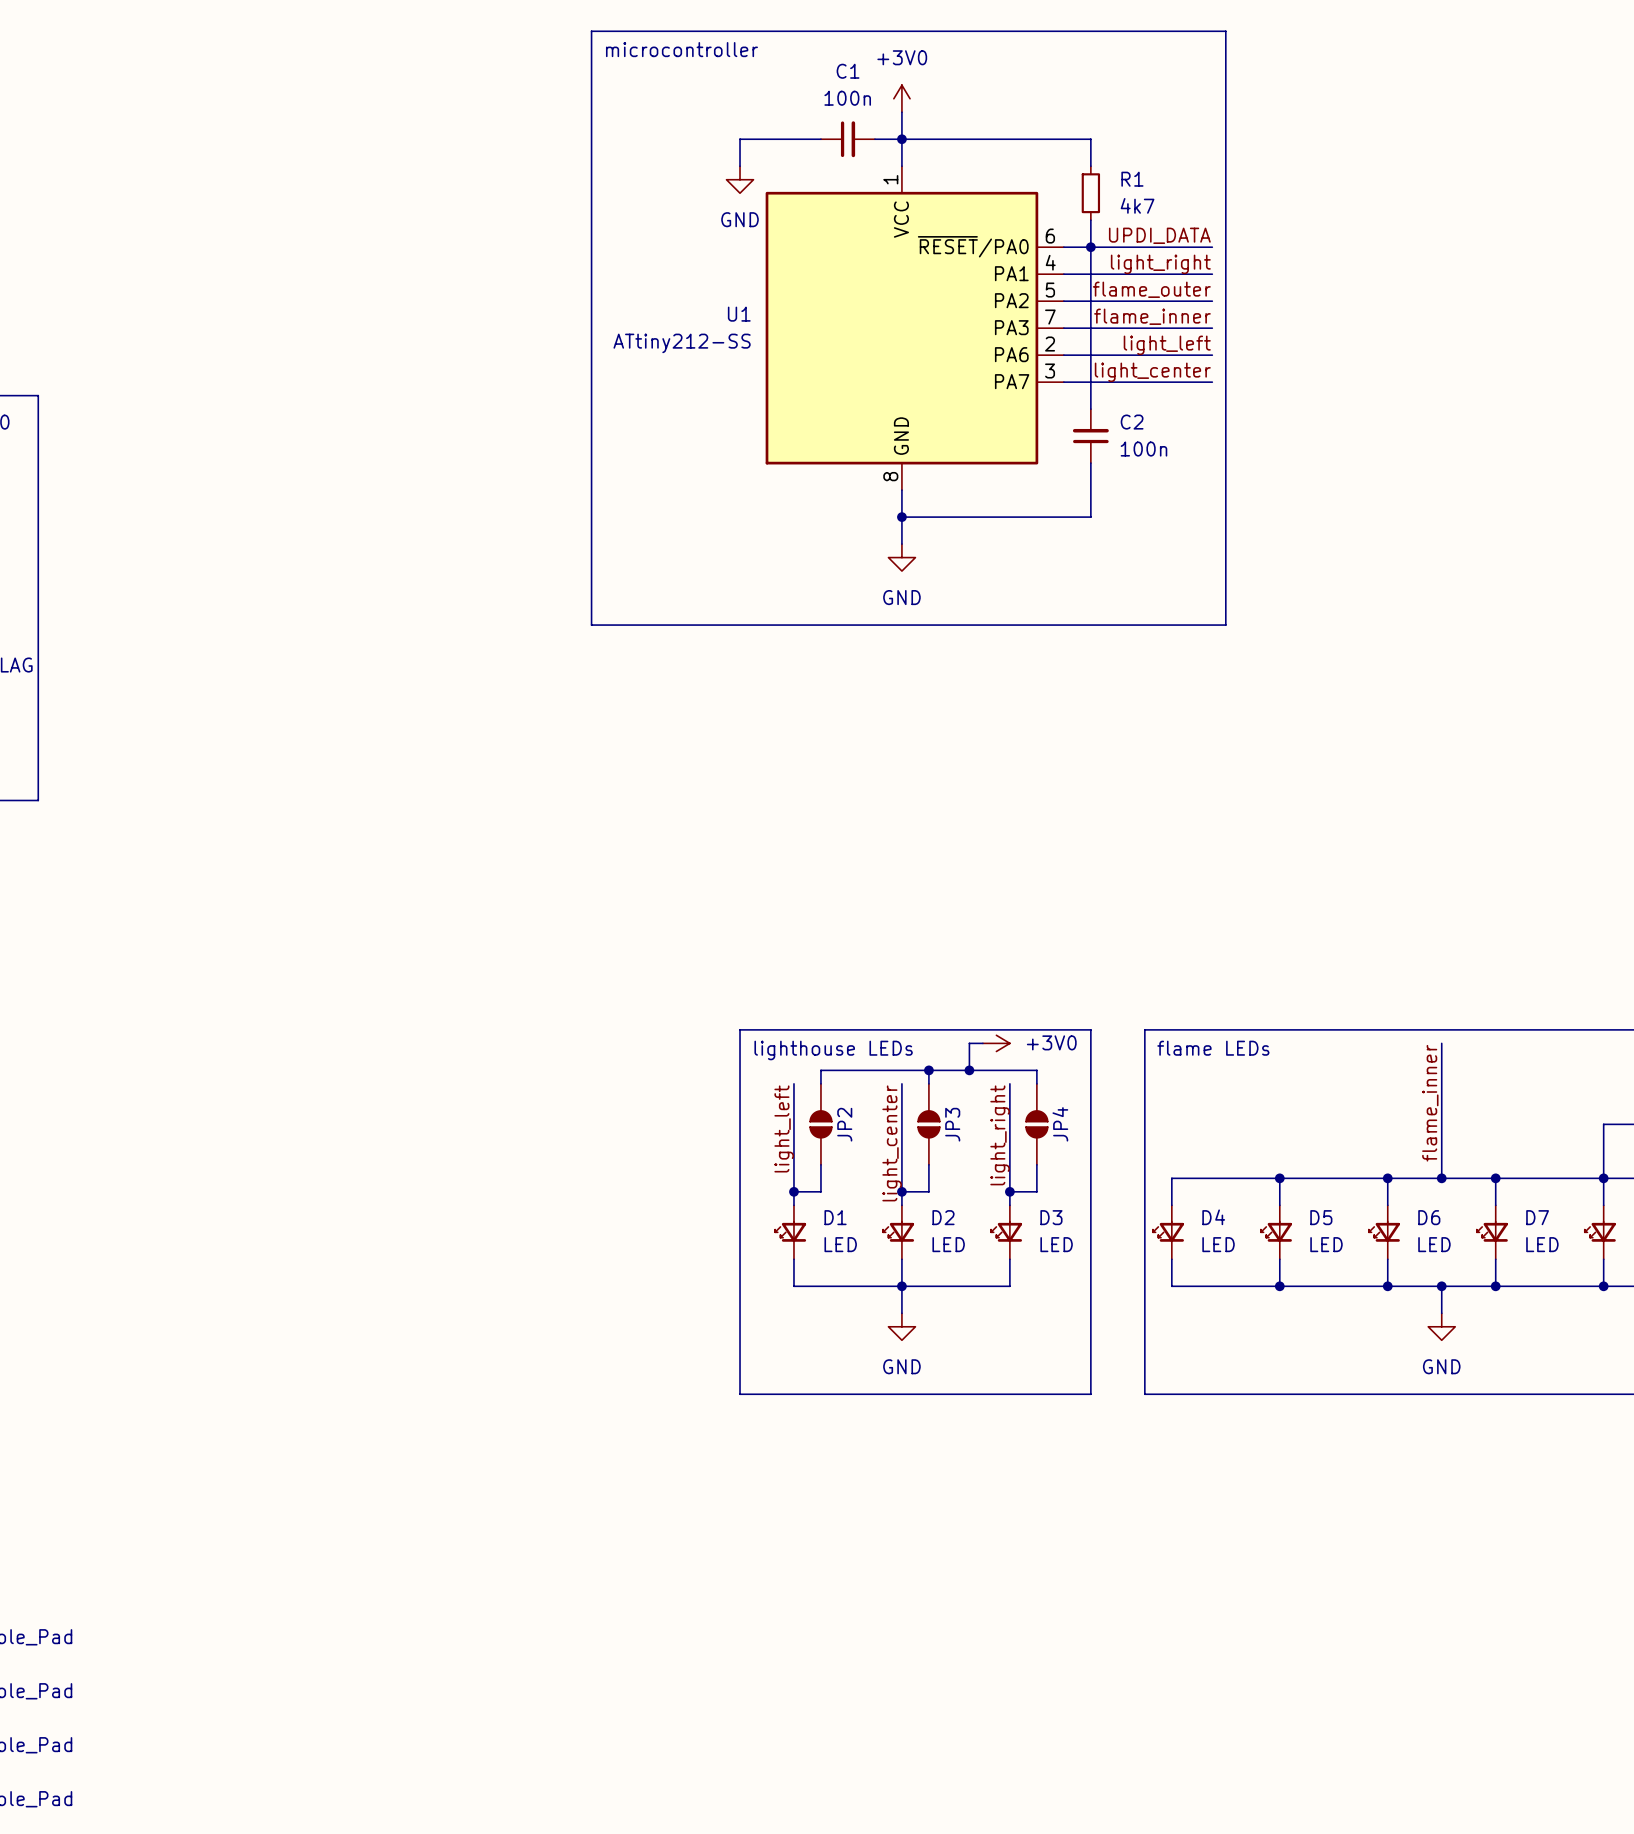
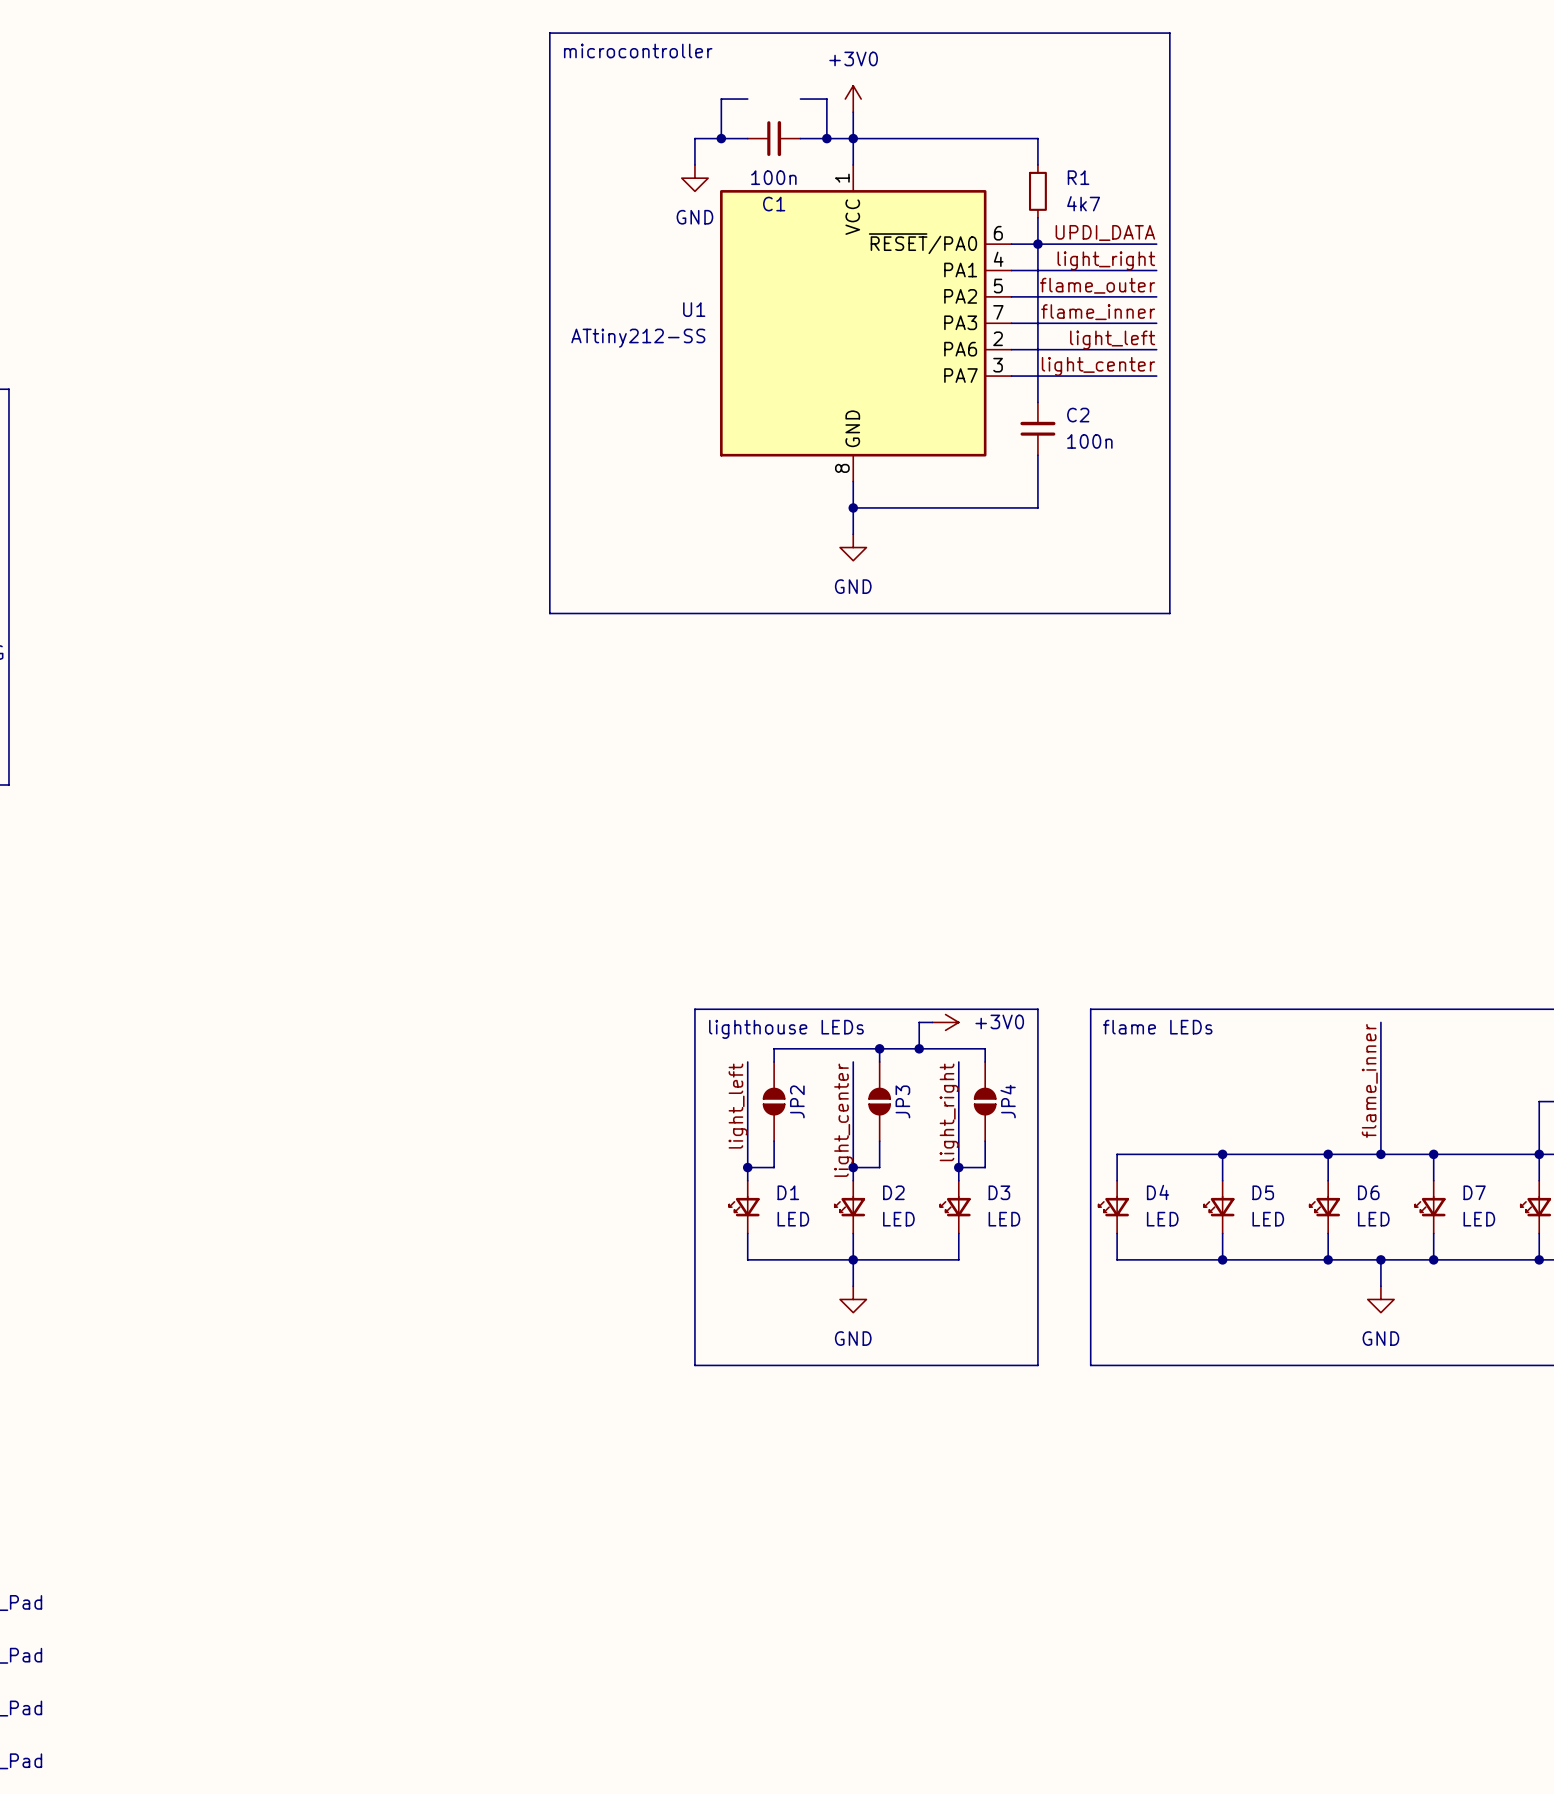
C1 name position: C1 (848, 71) -> C1 (774, 204)
wire: none -> (747, 99) (721, 99) (721, 138)
wire: none -> (800, 99) (826, 99) (826, 138) (800, 138)
C1 value position: 100n (847, 98) -> 100n (773, 177)
junction: none -> (721, 138)
C1 position: (847, 139) -> (774, 138)
junction: none -> (826, 138)

